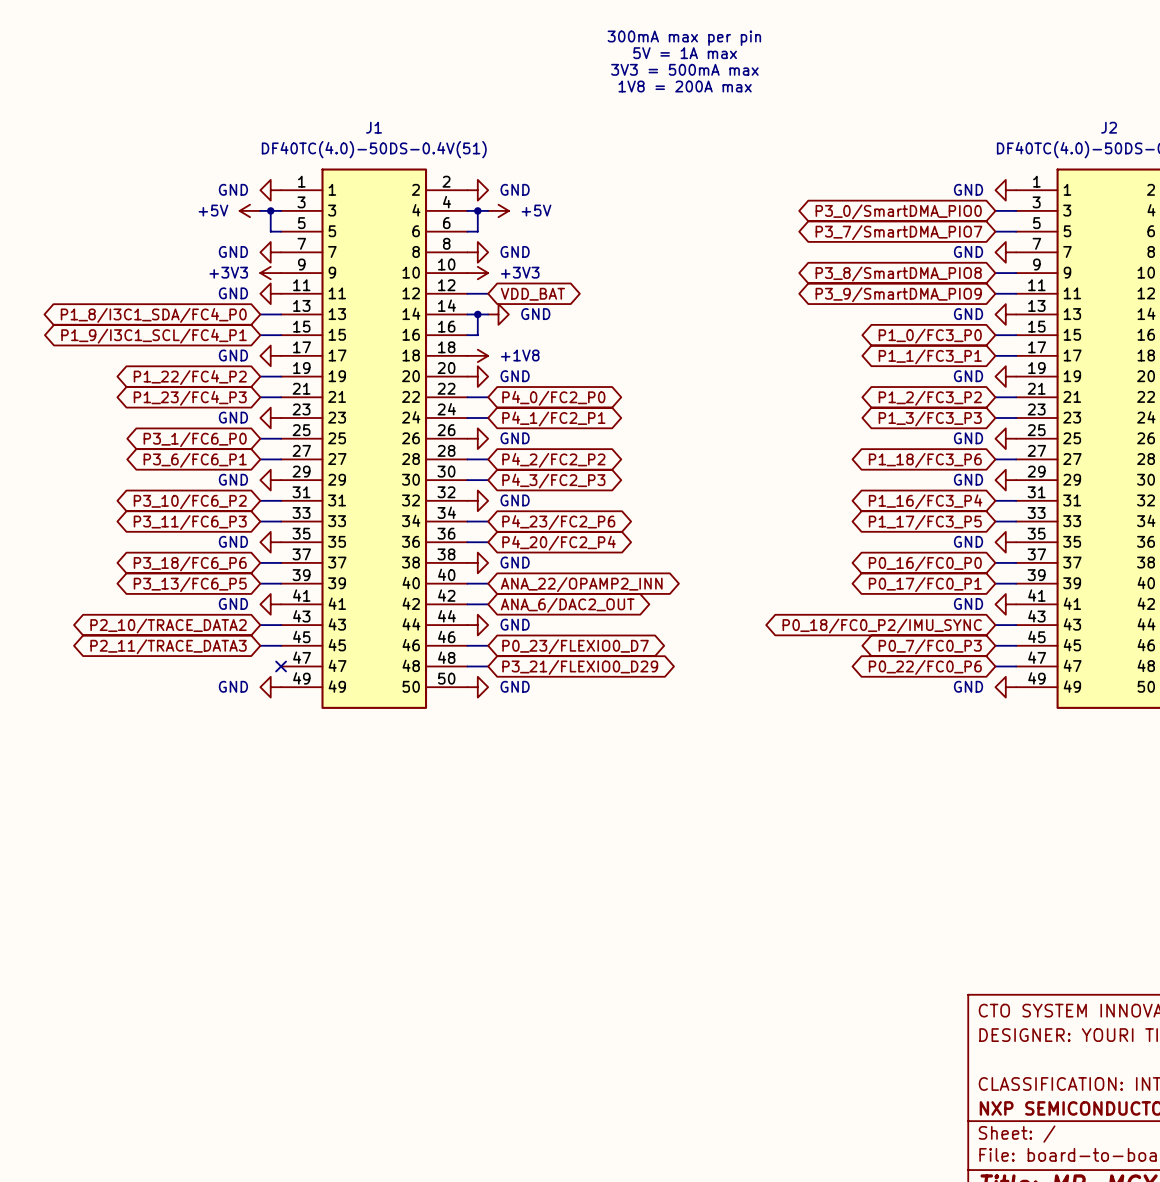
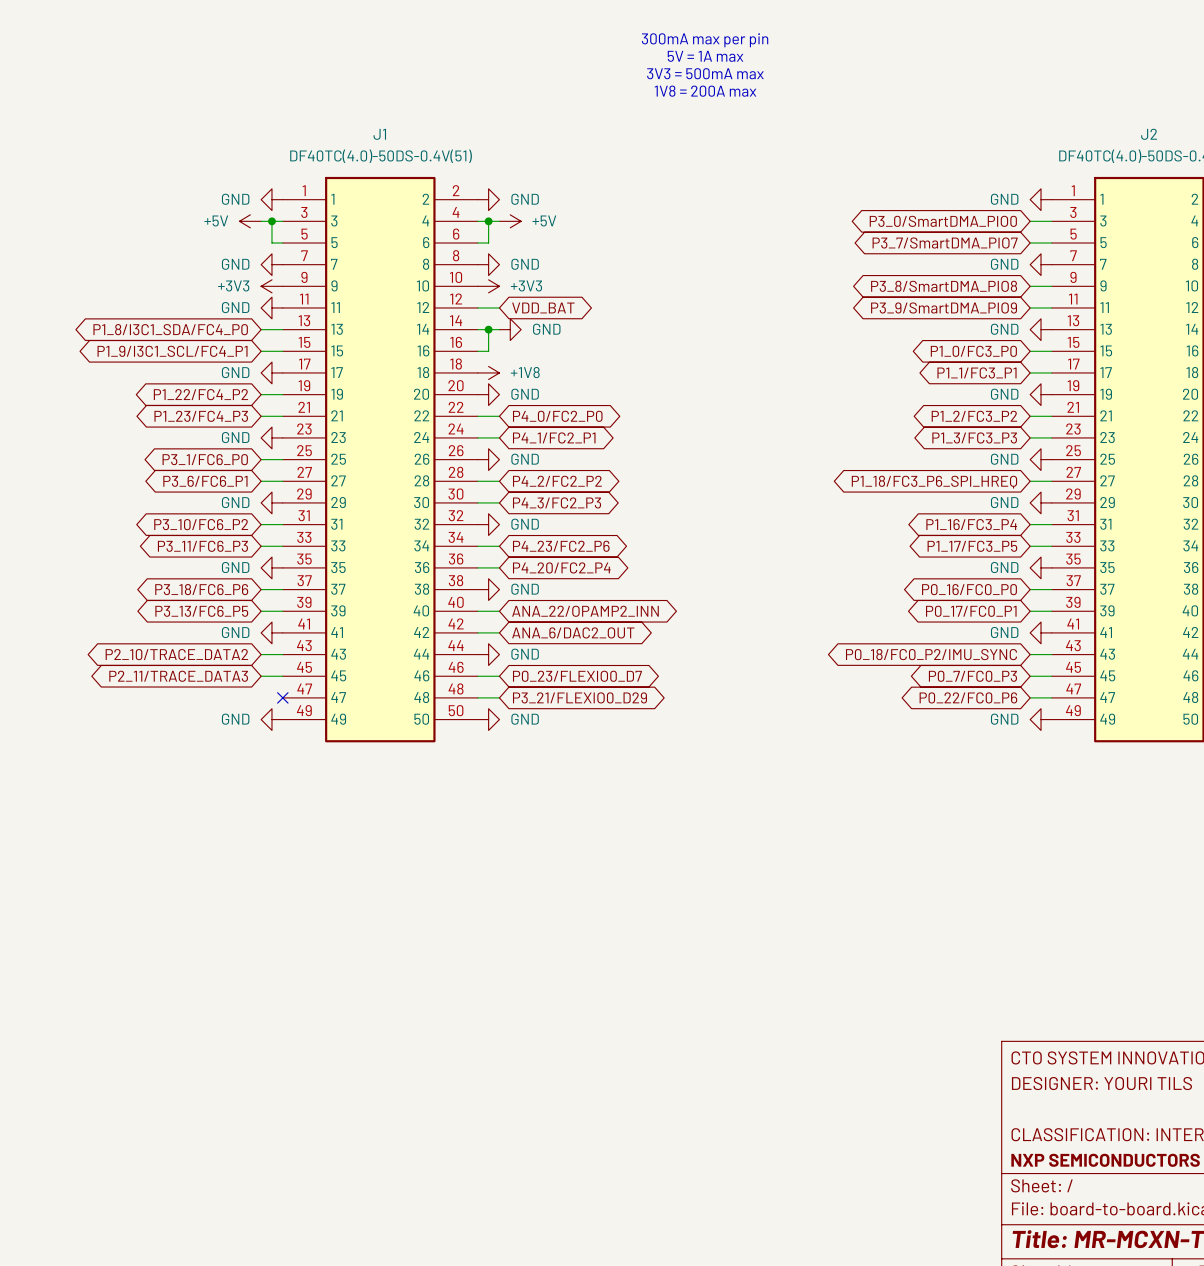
global label: P1_18/FC3_P6 (925, 460) -> P1_18/FC3_P6_SPI_HREQ (934, 482)

